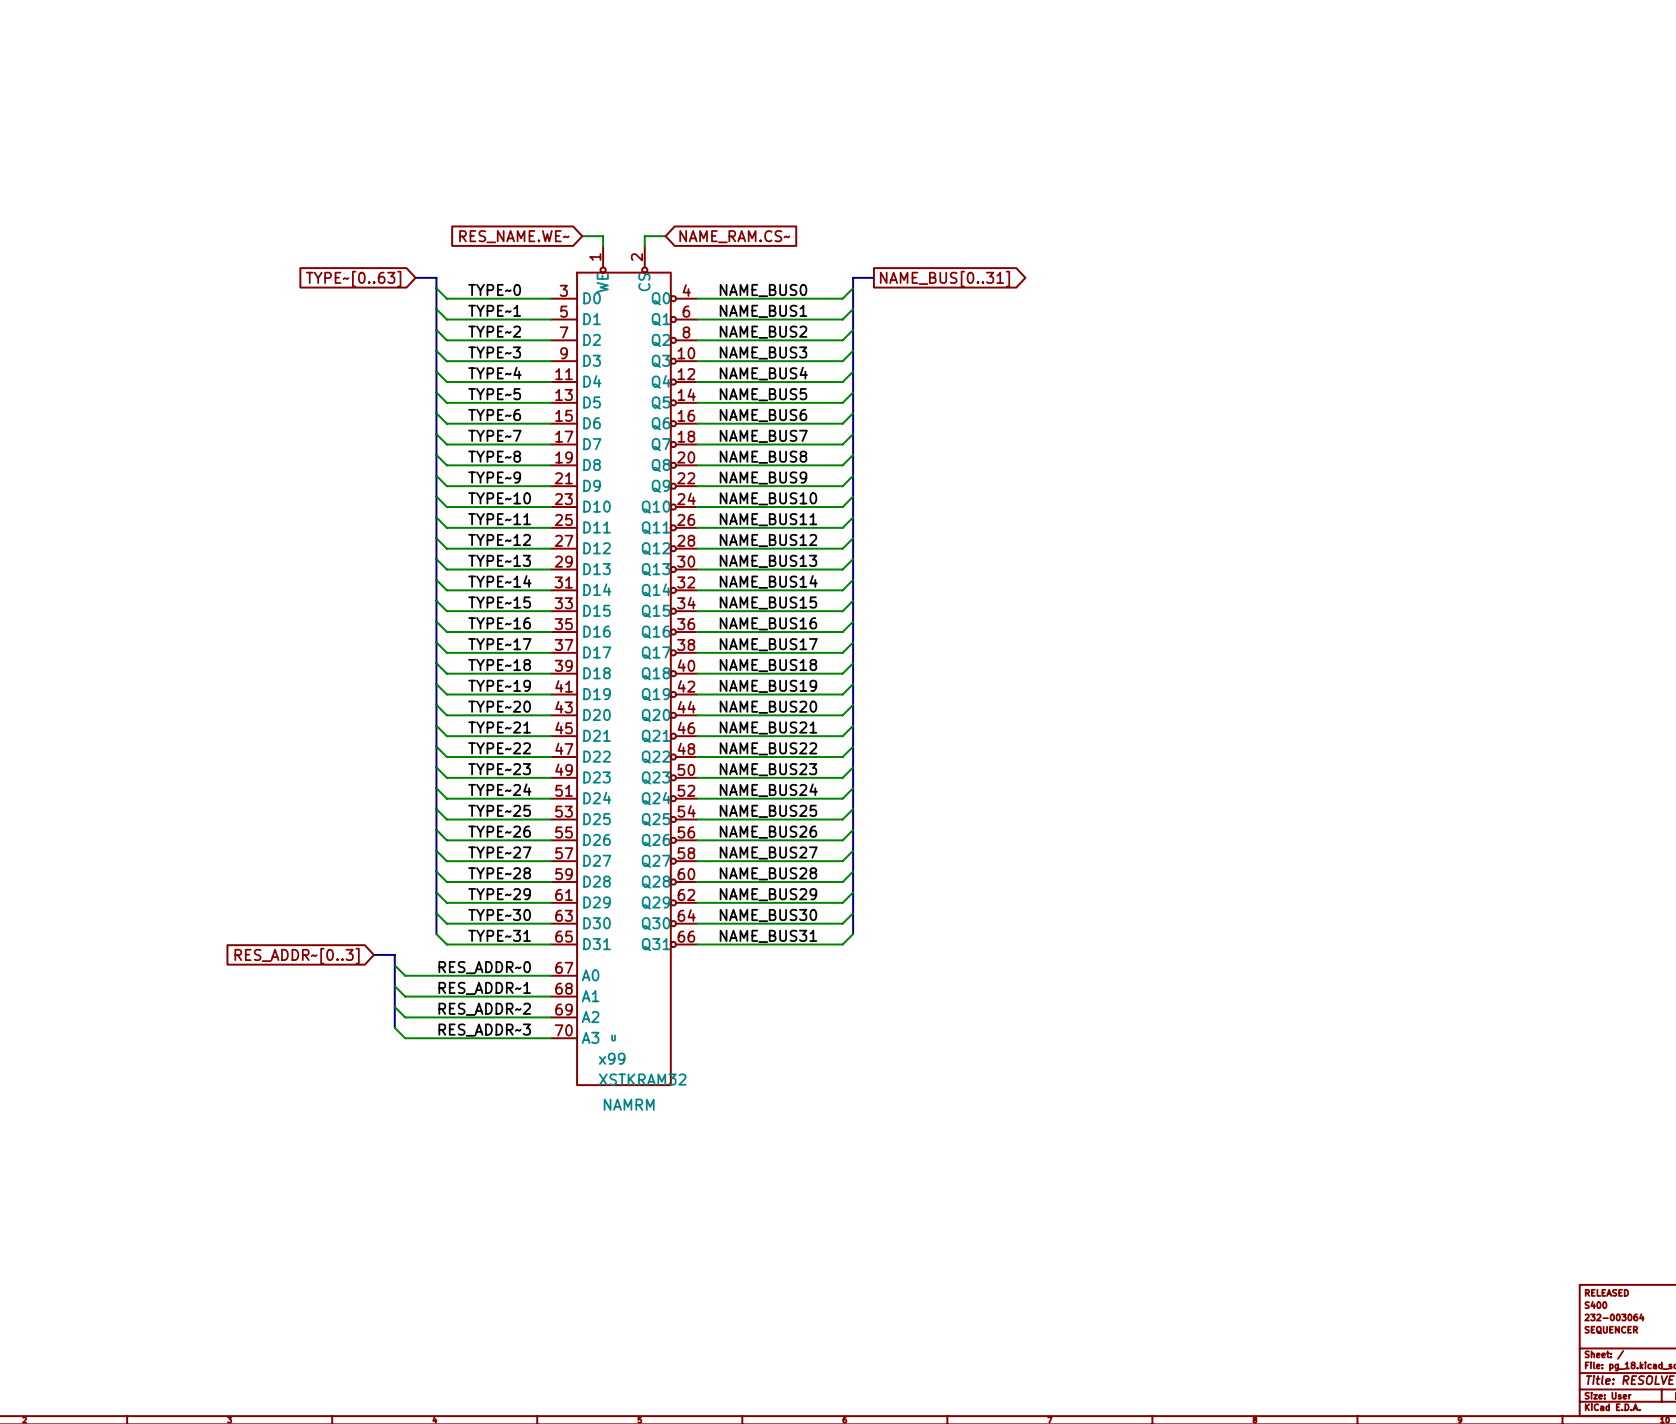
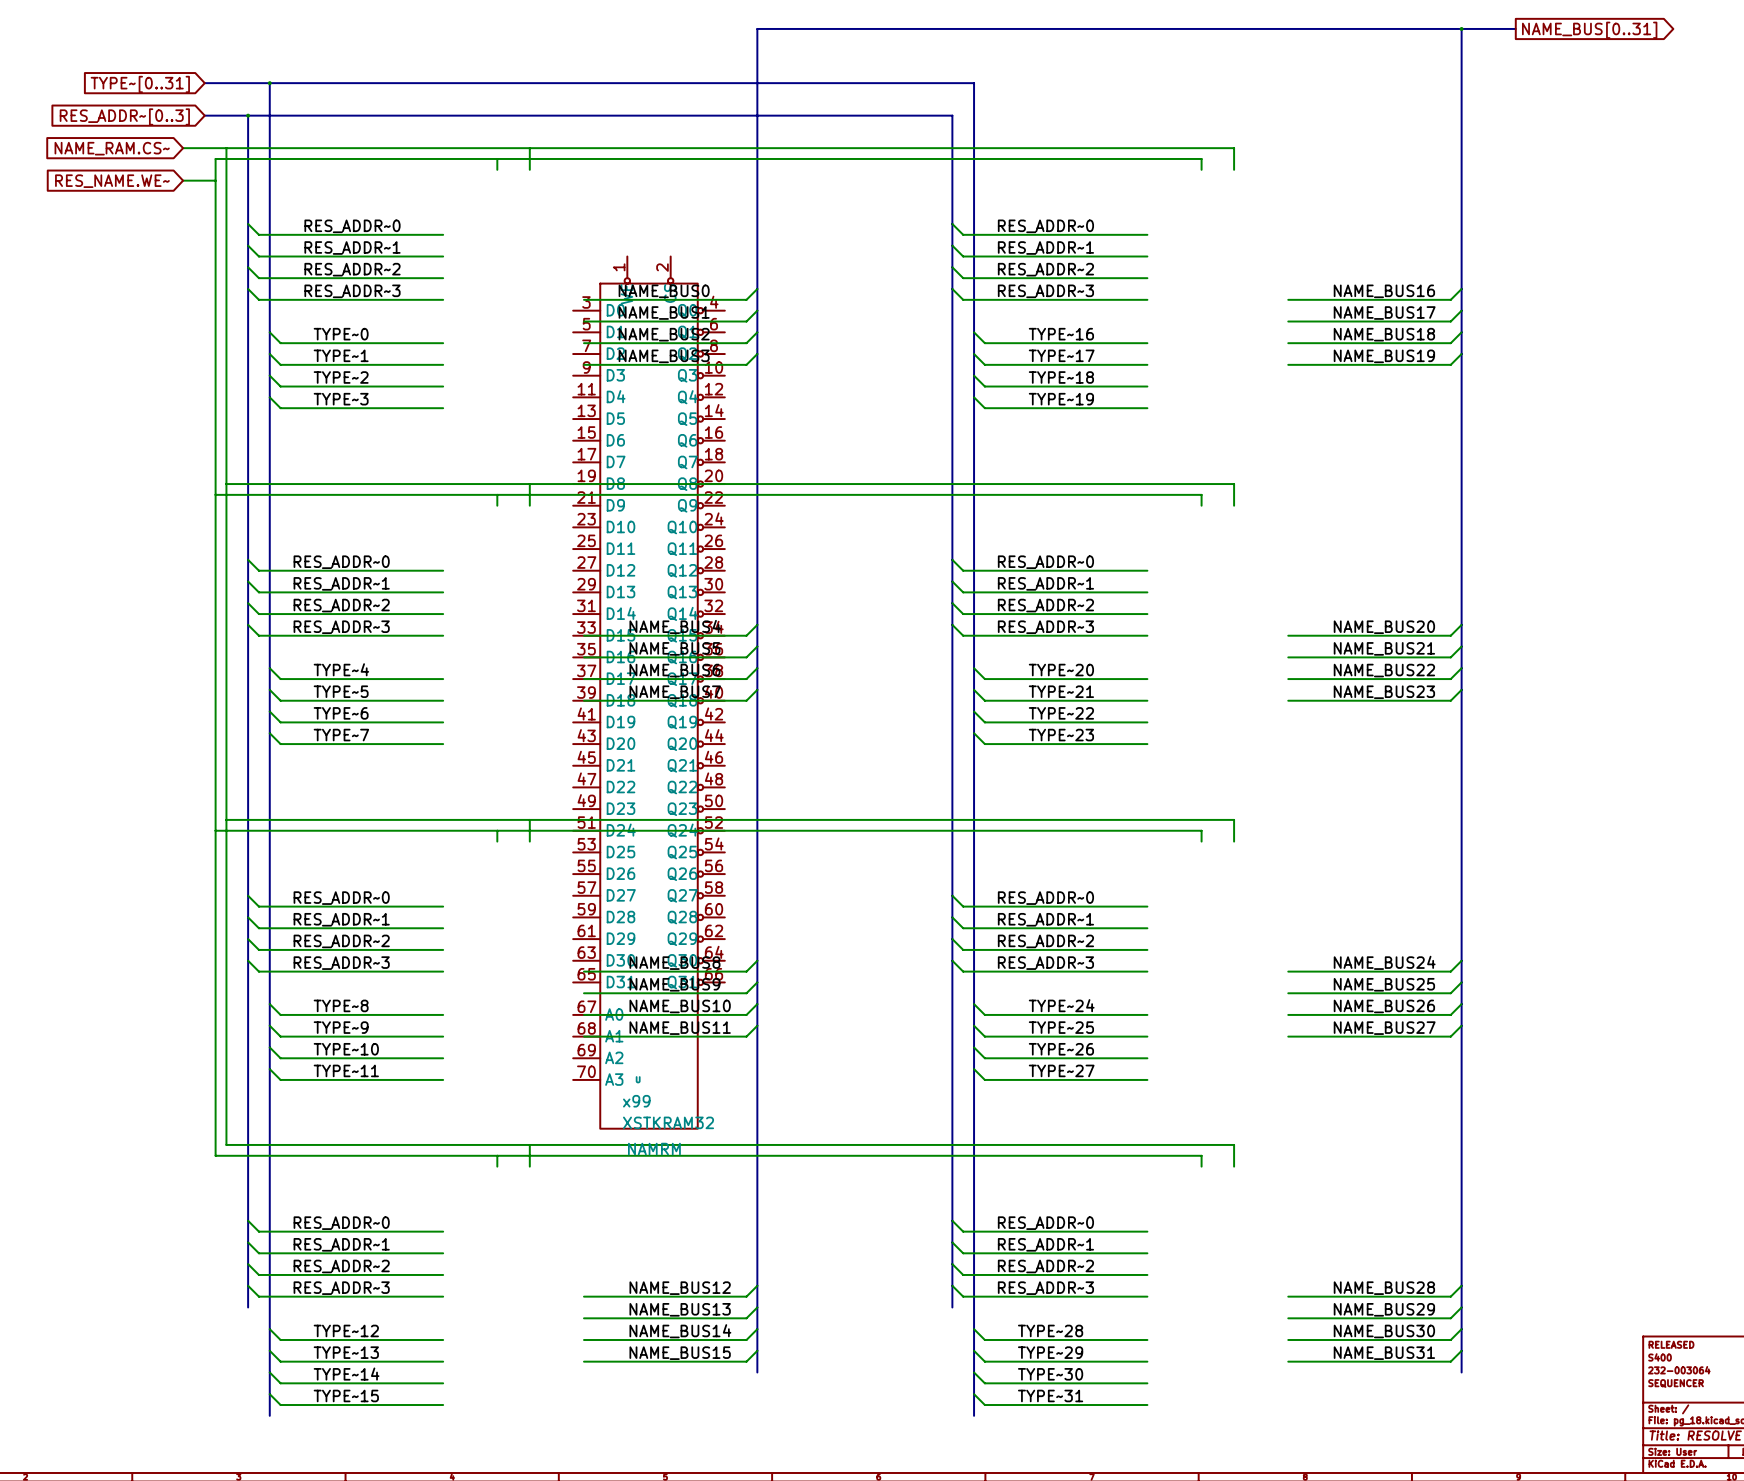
bus: none -> (1461, 28) (1461, 1372)
junction: none -> (1461, 28)
bus: none -> (1515, 28) (757, 28) (757, 1372)
global label: none -> NAME_BUS[0..31] (1589, 30)
bus: none -> (204, 83) (974, 83) (974, 1415)
bus: none -> (269, 83) (269, 1415)
junction: none -> (269, 83)
global label: none -> TYPE~[0..31] (140, 84)
bus: none -> (204, 115) (952, 115) (952, 1307)
bus: none -> (248, 115) (248, 1307)
junction: none -> (248, 115)
global label: none -> RES_ADDR~[0..3] (124, 116)
global label: none -> NAME_RAM.CS~ (112, 148)
wire: none -> (183, 148) (1234, 148) (1234, 169)
wire: none -> (226, 148) (226, 1144) (1234, 1144) (1234, 1166)
wire: none -> (529, 148) (529, 169)
wire: none -> (497, 158) (497, 169)
wire: none -> (1201, 169) (1201, 158) (215, 158) (215, 1155) (1201, 1155) (1201, 1166)
wire: none -> (183, 180) (215, 180)
global label: none -> RES_NAME.WE~ (112, 181)
wire: none -> (248, 223) (258, 234) (443, 234)
wire: none -> (952, 223) (963, 234) (1147, 234)
label: none -> RES_ADDR~0 (352, 226)
label: none -> RES_ADDR~0 (1045, 226)
wire: none -> (248, 245) (258, 256) (443, 256)
global label: RES_NAME.WE~ (514, 236) -> none
wire: (582, 236) (603, 236) (603, 246) -> none
wire: (665, 236) (644, 236) (644, 246) -> none
global label: NAME_RAM.CS~ (734, 236) -> none
wire: none -> (952, 245) (963, 256) (1147, 256)
label: none -> RES_ADDR~1 (352, 248)
label: none -> RES_ADDR~1 (1045, 248)
wire: none -> (248, 267) (258, 278) (443, 278)
wire: none -> (952, 267) (963, 278) (1147, 278)
label: none -> RES_ADDR~2 (352, 269)
label: none -> RES_ADDR~2 (1045, 269)
wire: none -> (248, 289) (258, 299) (443, 299)
bus: (415, 277) (436, 277) (436, 934) -> none
wire: none -> (757, 289) (746, 299) (583, 299)
bus: (873, 277) (853, 277) (853, 934) -> none
wire: none -> (952, 289) (963, 299) (1147, 299)
wire: none -> (1461, 289) (1450, 299) (1288, 299)
global label: TYPE~[0..63] (353, 279) -> none
global label: NAME_BUS[0..31] (944, 279) -> none
label: none -> RES_ADDR~3 (352, 291)
label: none -> NAME_BUS0 (664, 291)
label: none -> RES_ADDR~3 (1045, 291)
label: none -> NAME_BUS16 (1384, 291)
wire: (436, 288) (446, 298) (551, 298) -> none
wire: (853, 288) (842, 298) (696, 298) -> none
label: TYPE~0 (494, 290) -> none
label: NAME_BUS0 (763, 290) -> none
wire: none -> (757, 310) (746, 321) (583, 321)
wire: none -> (1461, 310) (1450, 321) (1288, 321)
label: none -> NAME_BUS1 (664, 313)
label: none -> NAME_BUS17 (1384, 313)
wire: (436, 309) (446, 319) (551, 319) -> none
wire: (853, 309) (842, 319) (696, 319) -> none
label: TYPE~1 (494, 310) -> none
label: NAME_BUS1 (763, 311) -> none
wire: none -> (269, 332) (280, 343) (443, 343)
wire: none -> (757, 332) (746, 343) (583, 343)
wire: none -> (974, 332) (984, 343) (1147, 343)
wire: none -> (1461, 332) (1450, 343) (1288, 343)
label: none -> TYPE~0 (341, 334)
label: none -> NAME_BUS2 (664, 334)
label: none -> TYPE~16 (1061, 334)
label: none -> NAME_BUS18 (1384, 334)
wire: (436, 329) (446, 340) (551, 340) -> none
wire: (853, 329) (842, 340) (696, 340) -> none
label: TYPE~2 (494, 331) -> none
label: NAME_BUS2 (763, 332) -> none
wire: none -> (269, 354) (280, 364) (443, 364)
wire: none -> (757, 354) (746, 364) (583, 364)
wire: none -> (974, 354) (984, 364) (1147, 364)
wire: none -> (1461, 354) (1450, 364) (1288, 364)
label: none -> TYPE~1 (341, 355)
label: none -> NAME_BUS3 (664, 356)
label: none -> TYPE~17 (1061, 355)
label: none -> NAME_BUS19 (1384, 356)
wire: (436, 350) (446, 361) (551, 361) -> none
wire: (853, 350) (842, 361) (696, 361) -> none
label: TYPE~3 (494, 352) -> none
label: NAME_BUS3 (763, 353) -> none
wire: none -> (269, 375) (280, 386) (443, 386)
wire: none -> (974, 375) (984, 386) (1147, 386)
label: none -> TYPE~2 (341, 377)
label: none -> TYPE~18 (1061, 377)
wire: (436, 371) (446, 382) (551, 382) -> none
wire: (853, 371) (842, 382) (696, 382) -> none
label: TYPE~4 (494, 373) -> none
label: NAME_BUS4 (763, 373) -> none
wire: none -> (269, 397) (280, 408) (443, 408)
wire: none -> (974, 397) (984, 408) (1147, 408)
label: none -> TYPE~3 (341, 399)
label: none -> TYPE~19 (1061, 399)
wire: (436, 392) (446, 402) (551, 402) -> none
wire: (853, 392) (842, 402) (696, 402) -> none
label: TYPE~5 (494, 394) -> none
label: NAME_BUS5 (763, 394) -> none
wire: (436, 413) (446, 423) (551, 423) -> none
wire: (853, 413) (842, 423) (696, 423) -> none
label: TYPE~6 (494, 415) -> none
label: NAME_BUS6 (763, 415) -> none
wire: (436, 434) (446, 444) (551, 444) -> none
wire: (853, 434) (842, 444) (696, 444) -> none
label: TYPE~7 (494, 435) -> none
label: NAME_BUS7 (763, 436) -> none
wire: (436, 454) (446, 465) -> (226, 484) (464, 484)
wire: (853, 454) (842, 465) -> (1234, 505) (1234, 484) (876, 484)
label: TYPE~8 (494, 456) -> none
label: NAME_BUS8 (763, 457) -> none
wire: none -> (529, 484) (529, 505)
wire: none -> (573, 484) (724, 484)
wire: none -> (215, 494) (1201, 494) (1201, 505)
wire: (436, 475) (446, 486) (551, 486) -> none
wire: none -> (497, 494) (497, 505)
wire: (853, 475) (842, 486) (696, 486) -> none
label: TYPE~9 (494, 477) -> none
label: NAME_BUS9 (763, 478) -> none
wire: (436, 496) (446, 507) (551, 507) -> none
wire: (853, 496) (842, 507) (696, 507) -> none
label: TYPE~10 (499, 498) -> none
label: NAME_BUS10 (768, 498) -> none
wire: (436, 517) (446, 527) (551, 527) -> none
wire: (853, 517) (842, 527) (696, 527) -> none
label: TYPE~11 (499, 519) -> none
label: NAME_BUS11 (768, 519) -> none
wire: none -> (248, 559) (258, 570) (443, 570)
wire: (436, 538) (446, 548) (551, 548) -> none
wire: (853, 538) (842, 548) (696, 548) -> none
wire: none -> (952, 559) (963, 570) (1147, 570)
label: none -> RES_ADDR~0 (341, 562)
label: TYPE~12 (499, 540) -> none
label: NAME_BUS12 (768, 540) -> none
label: none -> RES_ADDR~0 (1045, 562)
wire: none -> (248, 581) (258, 592) (443, 592)
wire: (436, 559) (446, 569) (551, 569) -> none
wire: (853, 559) (842, 569) (696, 569) -> none
wire: none -> (952, 581) (963, 592) (1147, 592)
label: TYPE~13 (499, 560) -> none
label: none -> RES_ADDR~1 (341, 583)
label: NAME_BUS13 (768, 561) -> none
label: none -> RES_ADDR~1 (1045, 583)
wire: none -> (248, 603) (258, 614) (443, 614)
wire: (436, 579) (446, 590) (551, 590) -> none
wire: (853, 579) (842, 590) (696, 590) -> none
wire: none -> (952, 603) (963, 614) (1147, 614)
label: TYPE~14 (499, 581) -> none
label: NAME_BUS14 (768, 581) -> none
label: none -> RES_ADDR~2 (341, 605)
label: none -> RES_ADDR~2 (1045, 605)
wire: none -> (248, 624) (258, 635) (443, 635)
wire: (436, 600) (446, 611) (551, 611) -> none
wire: (853, 600) (842, 611) (717, 611) -> (757, 624) (746, 635)
wire: none -> (952, 624) (963, 635) (1147, 635)
wire: none -> (1461, 624) (1450, 635) (1288, 635)
label: TYPE~15 (499, 602) -> none
label: none -> NAME_BUS4 (675, 626)
label: none -> RES_ADDR~3 (341, 627)
label: NAME_BUS15 (768, 603) -> none
label: none -> RES_ADDR~3 (1045, 627)
label: none -> NAME_BUS20 (1384, 627)
wire: none -> (583, 635) (724, 635)
wire: (436, 621) (446, 632) (551, 632) -> none
wire: (853, 621) (842, 632) (717, 632) -> (757, 646) (746, 657)
wire: none -> (1461, 646) (1450, 657) (1288, 657)
label: TYPE~16 (499, 623) -> none
label: none -> NAME_BUS5 (674, 648)
label: NAME_BUS16 (768, 623) -> none
label: none -> NAME_BUS21 (1384, 648)
wire: none -> (583, 657) (724, 657)
wire: none -> (269, 668) (280, 679) (443, 679)
wire: (436, 642) (446, 652) (551, 652) -> none
wire: (853, 642) (842, 652) (717, 652) -> (757, 668) (746, 679)
wire: none -> (974, 668) (984, 679) (1147, 679)
wire: none -> (1461, 668) (1450, 679) (1288, 679)
label: none -> TYPE~4 (341, 669)
label: TYPE~17 (499, 644) -> none
label: none -> NAME_BUS6 (674, 670)
label: NAME_BUS17 (768, 644) -> none
label: none -> TYPE~20 (1061, 670)
label: none -> NAME_BUS22 (1384, 670)
wire: none -> (583, 679) (724, 679)
wire: none -> (269, 689) (280, 700) (443, 700)
wire: (436, 663) (446, 673) (551, 673) -> none
wire: (853, 663) (842, 673) (717, 673) -> (757, 689) (746, 700)
wire: none -> (974, 689) (984, 700) (1147, 700)
wire: none -> (1461, 689) (1450, 700) (1288, 700)
label: none -> TYPE~5 (341, 691)
label: TYPE~18 (499, 665) -> none
label: none -> NAME_BUS7 (675, 692)
label: NAME_BUS18 (768, 665) -> none
label: none -> TYPE~21 (1061, 691)
label: none -> NAME_BUS23 (1384, 692)
wire: none -> (583, 700) (724, 700)
wire: none -> (269, 711) (280, 722) (443, 722)
wire: (436, 684) (446, 694) (551, 694) -> none
wire: (853, 684) (842, 694) (696, 694) -> none
wire: none -> (974, 711) (984, 722) (1147, 722)
label: none -> TYPE~6 (341, 713)
label: TYPE~19 (499, 685) -> none
label: none -> TYPE~22 (1061, 713)
label: NAME_BUS19 (768, 686) -> none
wire: none -> (269, 733) (280, 744) (443, 744)
wire: (436, 704) (446, 715) (551, 715) -> none
wire: (853, 704) (842, 715) (696, 715) -> none
wire: none -> (974, 733) (984, 744) (1147, 744)
label: none -> TYPE~7 (341, 735)
label: TYPE~20 (499, 706) -> none
label: none -> TYPE~23 (1061, 735)
label: NAME_BUS20 (768, 707) -> none
wire: (436, 725) (446, 736) (551, 736) -> none
wire: (853, 725) (842, 736) (696, 736) -> none
label: TYPE~21 (499, 727) -> none
label: NAME_BUS21 (768, 728) -> none
wire: (436, 746) (446, 757) (551, 757) -> none
wire: (853, 746) (842, 757) (696, 757) -> none
label: TYPE~22 (499, 748) -> none
label: NAME_BUS22 (768, 748) -> none
wire: (436, 767) (446, 777) (551, 777) -> none
wire: (853, 767) (842, 777) (696, 777) -> none
label: TYPE~23 (499, 769) -> none
label: NAME_BUS23 (768, 769) -> none
wire: none -> (226, 819) (1234, 819) (1234, 841)
wire: (436, 788) (446, 798) -> (215, 830) (464, 830)
wire: none -> (529, 819) (529, 841)
wire: (853, 788) (842, 798) -> (1201, 841) (1201, 830) (876, 830)
label: TYPE~24 (499, 789) -> none
label: NAME_BUS24 (768, 790) -> none
wire: none -> (497, 830) (497, 841)
wire: none -> (573, 830) (724, 830)
wire: (436, 809) (446, 819) (551, 819) -> none
wire: (853, 809) (842, 819) (696, 819) -> none
label: TYPE~25 (499, 810) -> none
label: NAME_BUS25 (768, 811) -> none
wire: (436, 829) (446, 840) (551, 840) -> none
wire: (853, 829) (842, 840) (696, 840) -> none
label: TYPE~26 (499, 831) -> none
label: NAME_BUS26 (768, 832) -> none
wire: (436, 850) (446, 861) (551, 861) -> none
wire: (853, 850) (842, 861) (696, 861) -> none
label: TYPE~27 (499, 852) -> none
label: NAME_BUS27 (768, 853) -> none
wire: none -> (248, 895) (258, 906) (443, 906)
wire: none -> (952, 895) (963, 906) (1147, 906)
label: none -> RES_ADDR~0 (341, 898)
label: none -> RES_ADDR~0 (1045, 898)
wire: (436, 871) (446, 882) (551, 882) -> none
wire: (853, 871) (842, 882) (696, 882) -> none
label: TYPE~28 (499, 873) -> none
label: NAME_BUS28 (768, 873) -> none
wire: none -> (248, 917) (258, 928) (443, 928)
wire: none -> (952, 917) (963, 928) (1147, 928)
label: none -> RES_ADDR~1 (341, 919)
label: none -> RES_ADDR~1 (1045, 919)
wire: (436, 892) (446, 902) (551, 902) -> none
wire: (853, 892) (842, 902) (696, 902) -> none
label: TYPE~29 (499, 894) -> none
label: NAME_BUS29 (768, 894) -> none
wire: none -> (248, 939) (258, 949) (443, 949)
wire: none -> (952, 939) (963, 949) (1147, 949)
label: none -> RES_ADDR~2 (341, 941)
label: none -> RES_ADDR~2 (1045, 941)
wire: (436, 913) (446, 923) (551, 923) -> none
wire: (853, 913) (842, 923) (696, 923) -> none
label: TYPE~30 (499, 915) -> none
label: NAME_BUS30 (768, 915) -> none
wire: none -> (248, 960) (258, 971) (443, 971)
wire: none -> (757, 960) (746, 971) (583, 971)
wire: none -> (952, 960) (963, 971) (1147, 971)
wire: none -> (1461, 960) (1450, 971) (1288, 971)
label: none -> RES_ADDR~3 (341, 963)
label: none -> NAME_BUS8 (674, 963)
label: none -> RES_ADDR~3 (1045, 963)
label: none -> NAME_BUS24 (1384, 962)
wire: (436, 934) (446, 944) (551, 944) -> none
wire: (853, 934) (842, 944) (696, 944) -> none
label: TYPE~31 (499, 935) -> none
label: NAME_BUS31 (768, 936) -> none
wire: none -> (757, 982) (746, 993) (583, 993)
wire: none -> (1461, 982) (1450, 993) (1288, 993)
label: none -> NAME_BUS9 (674, 984)
label: none -> NAME_BUS25 (1384, 984)
bus: (373, 954) (394, 954) (394, 1027) -> none
global label: RES_ADDR~[0..3] (297, 956) -> none
wire: (394, 965) (405, 975) -> (269, 1004) (280, 1014) (421, 1014)
wire: none -> (757, 1004) (746, 1014) (583, 1014)
wire: none -> (974, 1004) (984, 1014) (1147, 1014)
wire: none -> (1461, 1004) (1450, 1014) (1288, 1014)
label: none -> TYPE~24 (1061, 1005)
label: none -> TYPE~8 (341, 1005)
label: RES_ADDR~0 (484, 967) -> none
label: none -> NAME_BUS10 (680, 1006)
label: none -> NAME_BUS26 (1384, 1006)
wire: (426, 975) (551, 975) -> none
wire: (394, 986) (405, 996) -> (269, 1025) (280, 1036) (421, 1036)
wire: none -> (757, 1025) (746, 1036) (583, 1036)
wire: none -> (974, 1025) (984, 1036) (1147, 1036)
wire: none -> (1461, 1025) (1450, 1036) (1288, 1036)
label: none -> TYPE~9 (341, 1027)
label: none -> TYPE~25 (1061, 1027)
label: RES_ADDR~1 (484, 988) -> none
label: none -> NAME_BUS11 (680, 1028)
label: none -> NAME_BUS27 (1384, 1028)
wire: (426, 996) (551, 996) -> none
wire: (394, 1007) (405, 1017) -> (269, 1047) (280, 1058) (421, 1058)
wire: none -> (974, 1047) (984, 1058) (1147, 1058)
label: none -> TYPE~10 (346, 1049)
label: none -> TYPE~26 (1061, 1049)
label: RES_ADDR~2 (484, 1009) -> none
wire: (426, 1017) (551, 1017) -> none
wire: (394, 1027) (405, 1038) -> (269, 1069) (280, 1079) (421, 1079)
wire: none -> (974, 1069) (984, 1079) (1147, 1079)
label: none -> TYPE~11 (346, 1070)
label: none -> TYPE~27 (1061, 1070)
label: RES_ADDR~3 (484, 1030) -> none
wire: (426, 1038) (551, 1038) -> none
wire: none -> (529, 1144) (529, 1166)
wire: none -> (497, 1155) (497, 1166)
wire: none -> (248, 1220) (258, 1231) (443, 1231)
wire: none -> (952, 1220) (963, 1231) (1147, 1231)
label: none -> RES_ADDR~0 (341, 1223)
label: none -> RES_ADDR~0 (1045, 1223)
wire: none -> (248, 1242) (258, 1253) (443, 1253)
wire: none -> (952, 1242) (963, 1253) (1147, 1253)
label: none -> RES_ADDR~1 (341, 1244)
label: none -> RES_ADDR~1 (1045, 1244)
wire: none -> (248, 1264) (258, 1274) (443, 1274)
wire: none -> (952, 1264) (963, 1274) (1147, 1274)
label: none -> RES_ADDR~2 (341, 1266)
label: none -> RES_ADDR~2 (1045, 1266)
wire: none -> (248, 1285) (258, 1296) (443, 1296)
wire: none -> (757, 1285) (746, 1296) (583, 1296)
wire: none -> (952, 1285) (963, 1296) (1147, 1296)
wire: none -> (1461, 1285) (1450, 1296) (1288, 1296)
label: none -> RES_ADDR~3 (341, 1288)
label: none -> NAME_BUS12 (680, 1288)
label: none -> RES_ADDR~3 (1045, 1288)
label: none -> NAME_BUS28 (1384, 1288)
wire: none -> (757, 1307) (746, 1318) (583, 1318)
wire: none -> (1461, 1307) (1450, 1318) (1288, 1318)
label: none -> NAME_BUS13 (680, 1309)
label: none -> NAME_BUS29 (1384, 1309)
wire: none -> (269, 1329) (280, 1339) (443, 1339)
wire: none -> (757, 1329) (746, 1339) (583, 1339)
wire: none -> (974, 1329) (984, 1339) (1147, 1339)
wire: none -> (1461, 1329) (1450, 1339) (1288, 1339)
label: none -> TYPE~12 (346, 1330)
label: none -> NAME_BUS14 (680, 1331)
label: none -> TYPE~28 (1050, 1330)
label: none -> NAME_BUS30 (1384, 1331)
wire: none -> (269, 1350) (280, 1361) (443, 1361)
wire: none -> (757, 1350) (746, 1361) (583, 1361)
wire: none -> (974, 1350) (984, 1361) (1147, 1361)
wire: none -> (1461, 1350) (1450, 1361) (1288, 1361)
label: none -> TYPE~13 (346, 1352)
label: none -> NAME_BUS15 (680, 1353)
label: none -> TYPE~29 (1050, 1352)
label: none -> NAME_BUS31 (1384, 1353)
wire: none -> (269, 1372) (280, 1383) (443, 1383)
wire: none -> (974, 1372) (984, 1383) (1147, 1383)
label: none -> TYPE~14 (346, 1374)
label: none -> TYPE~30 (1050, 1374)
wire: none -> (269, 1394) (280, 1405) (443, 1405)
wire: none -> (974, 1394) (984, 1405) (1147, 1405)
label: none -> TYPE~15 (346, 1395)
label: none -> TYPE~31 (1050, 1395)

